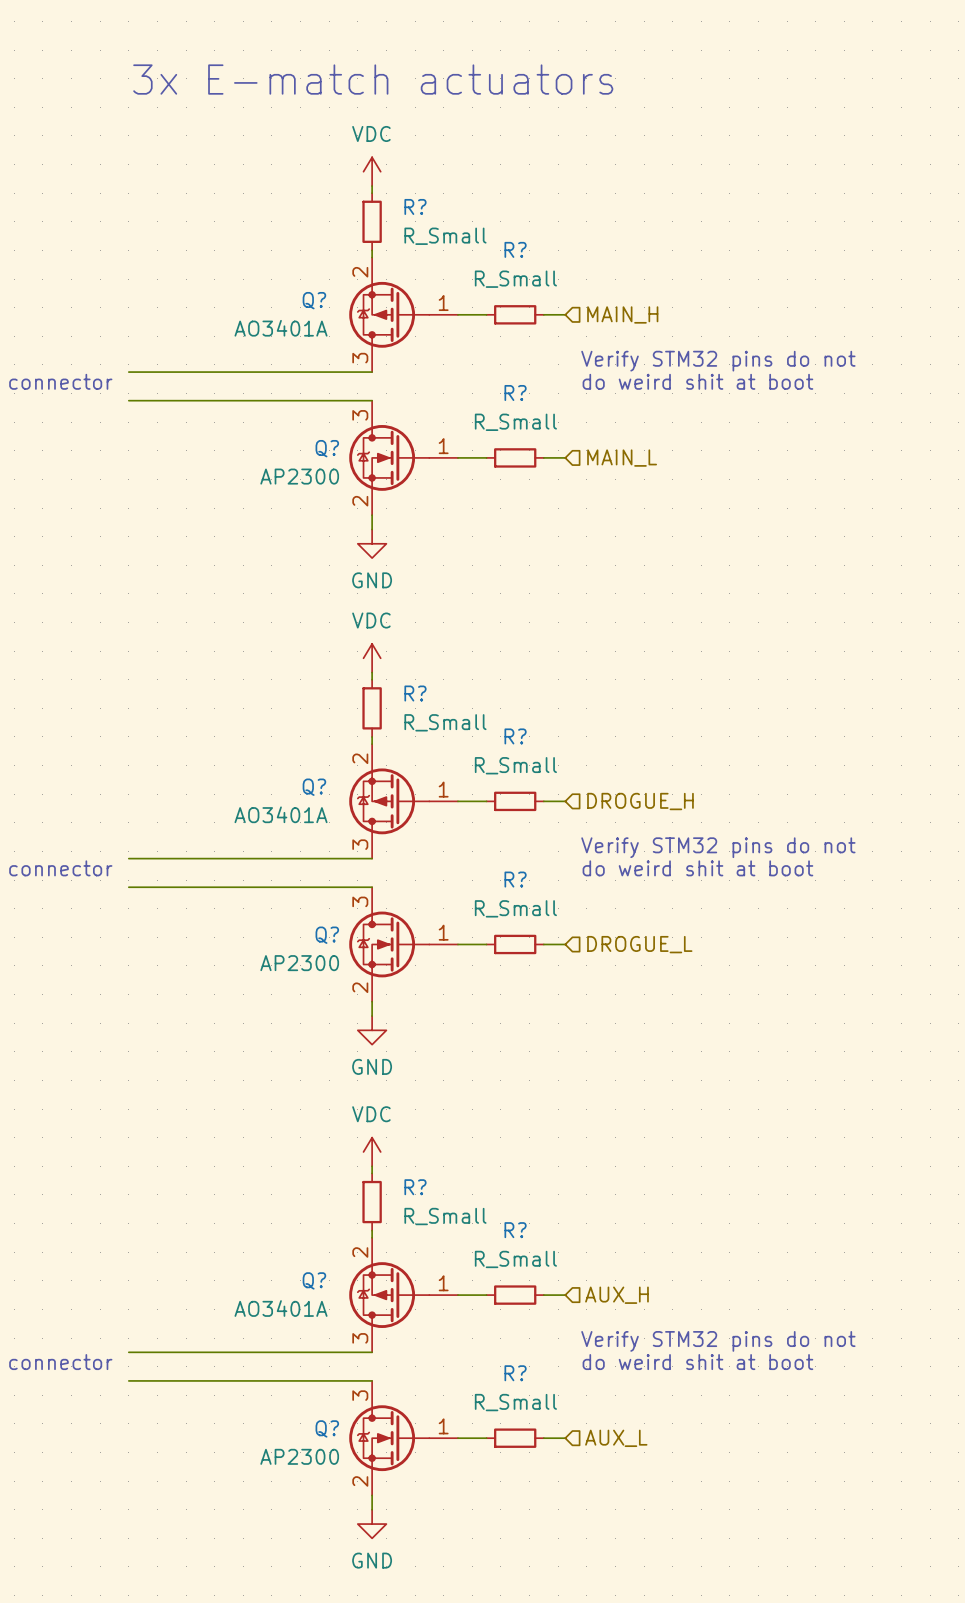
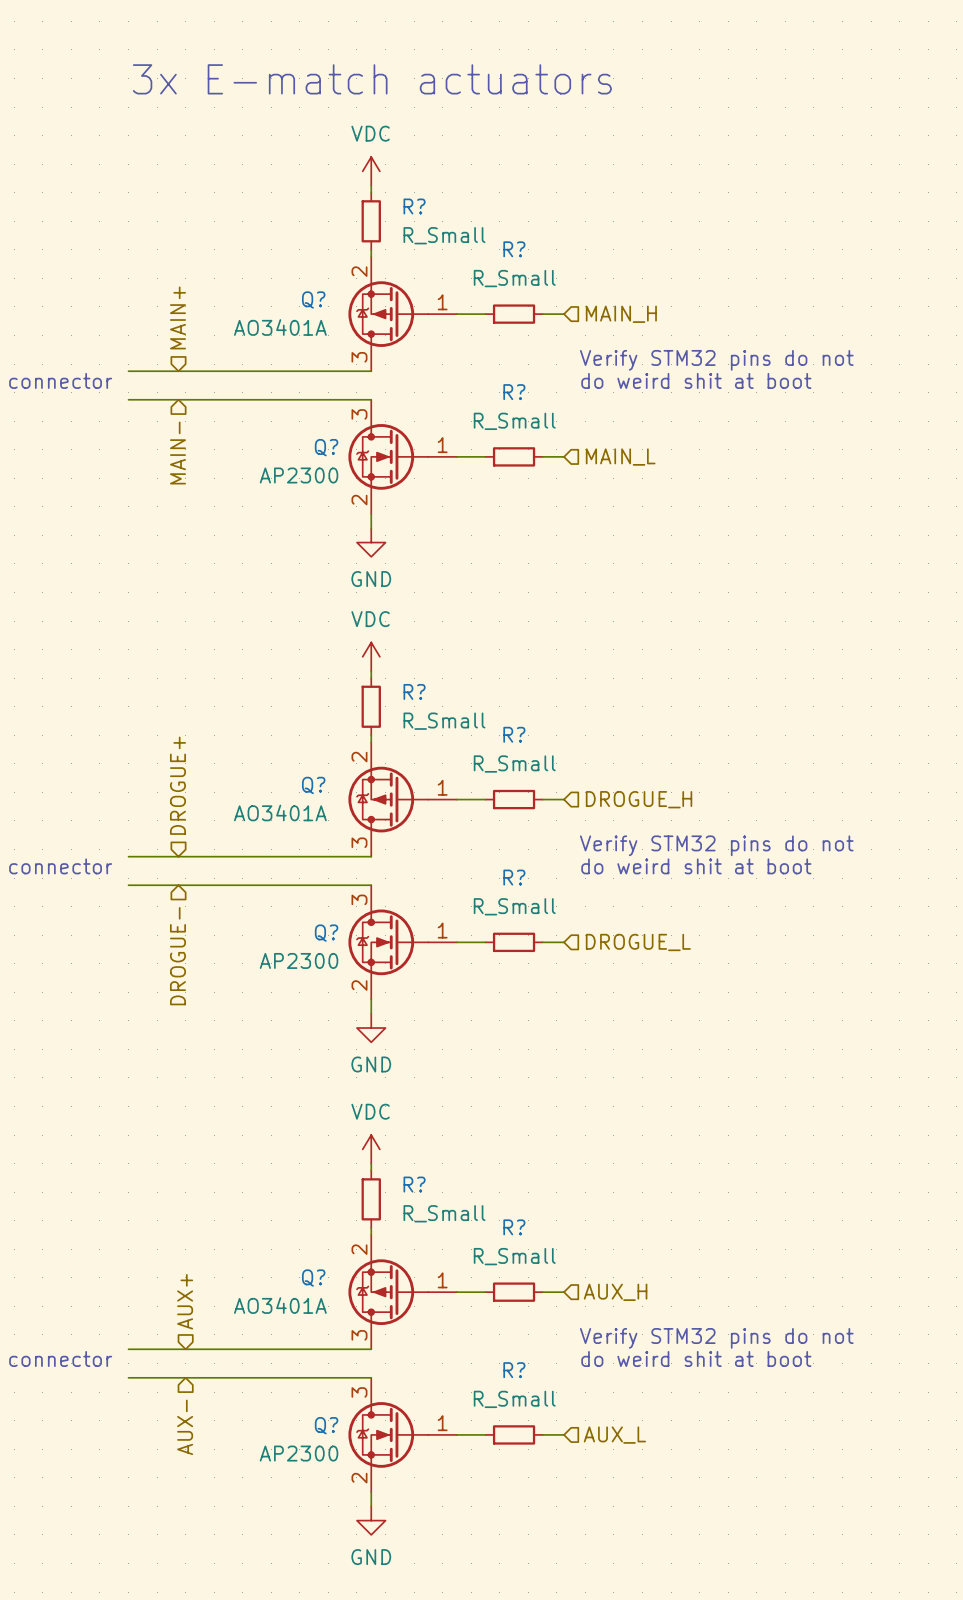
hierarchical label: none -> MAIN+ (177, 317)
hierarchical label: none -> MAIN- (177, 453)
hierarchical label: none -> DROGUE+ (177, 785)
hierarchical label: none -> DROGUE- (177, 956)
hierarchical label: none -> AUX+ (185, 1301)
hierarchical label: none -> AUX- (185, 1427)

